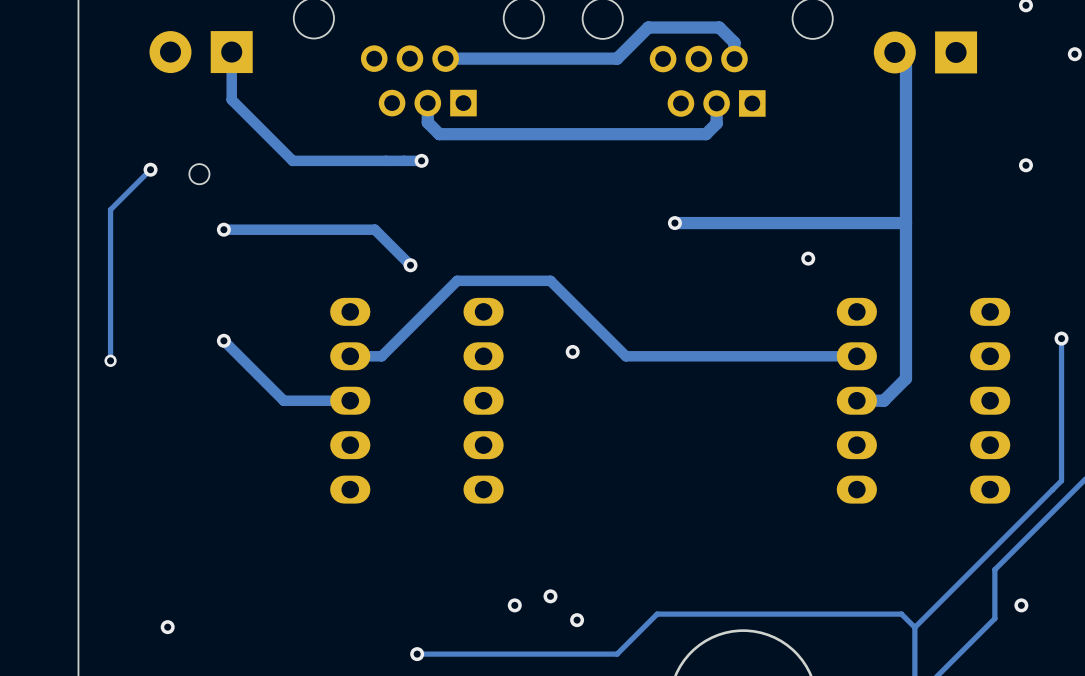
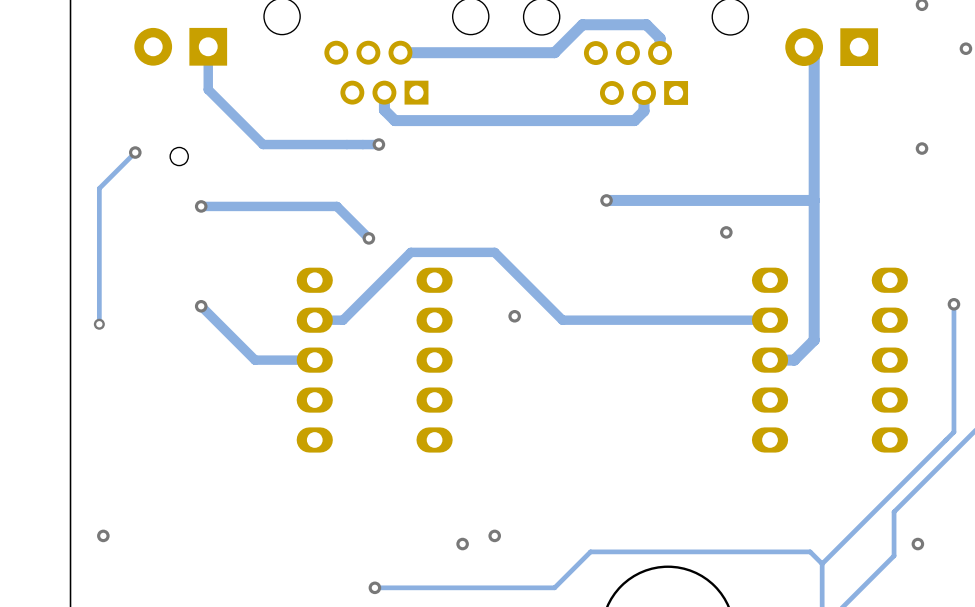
via: (577, 620) -> none
via position: (167, 627) -> (103, 535)

